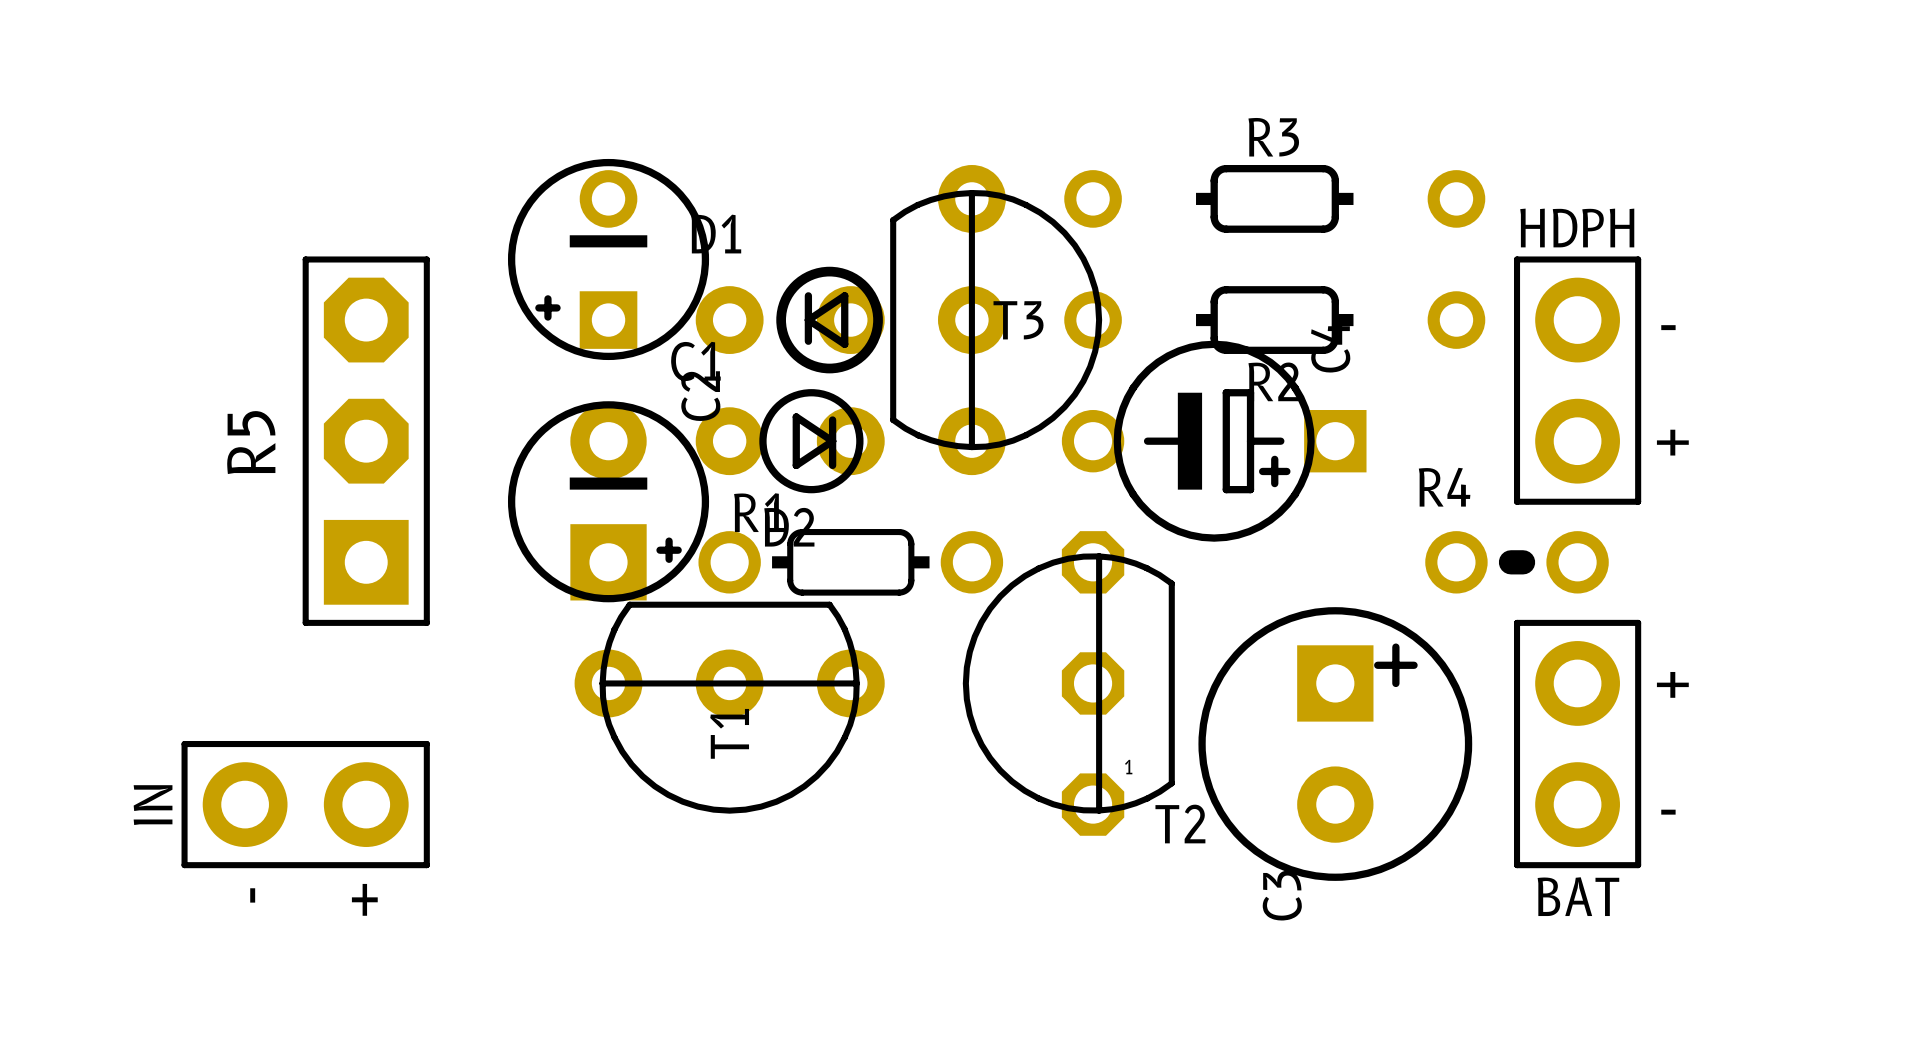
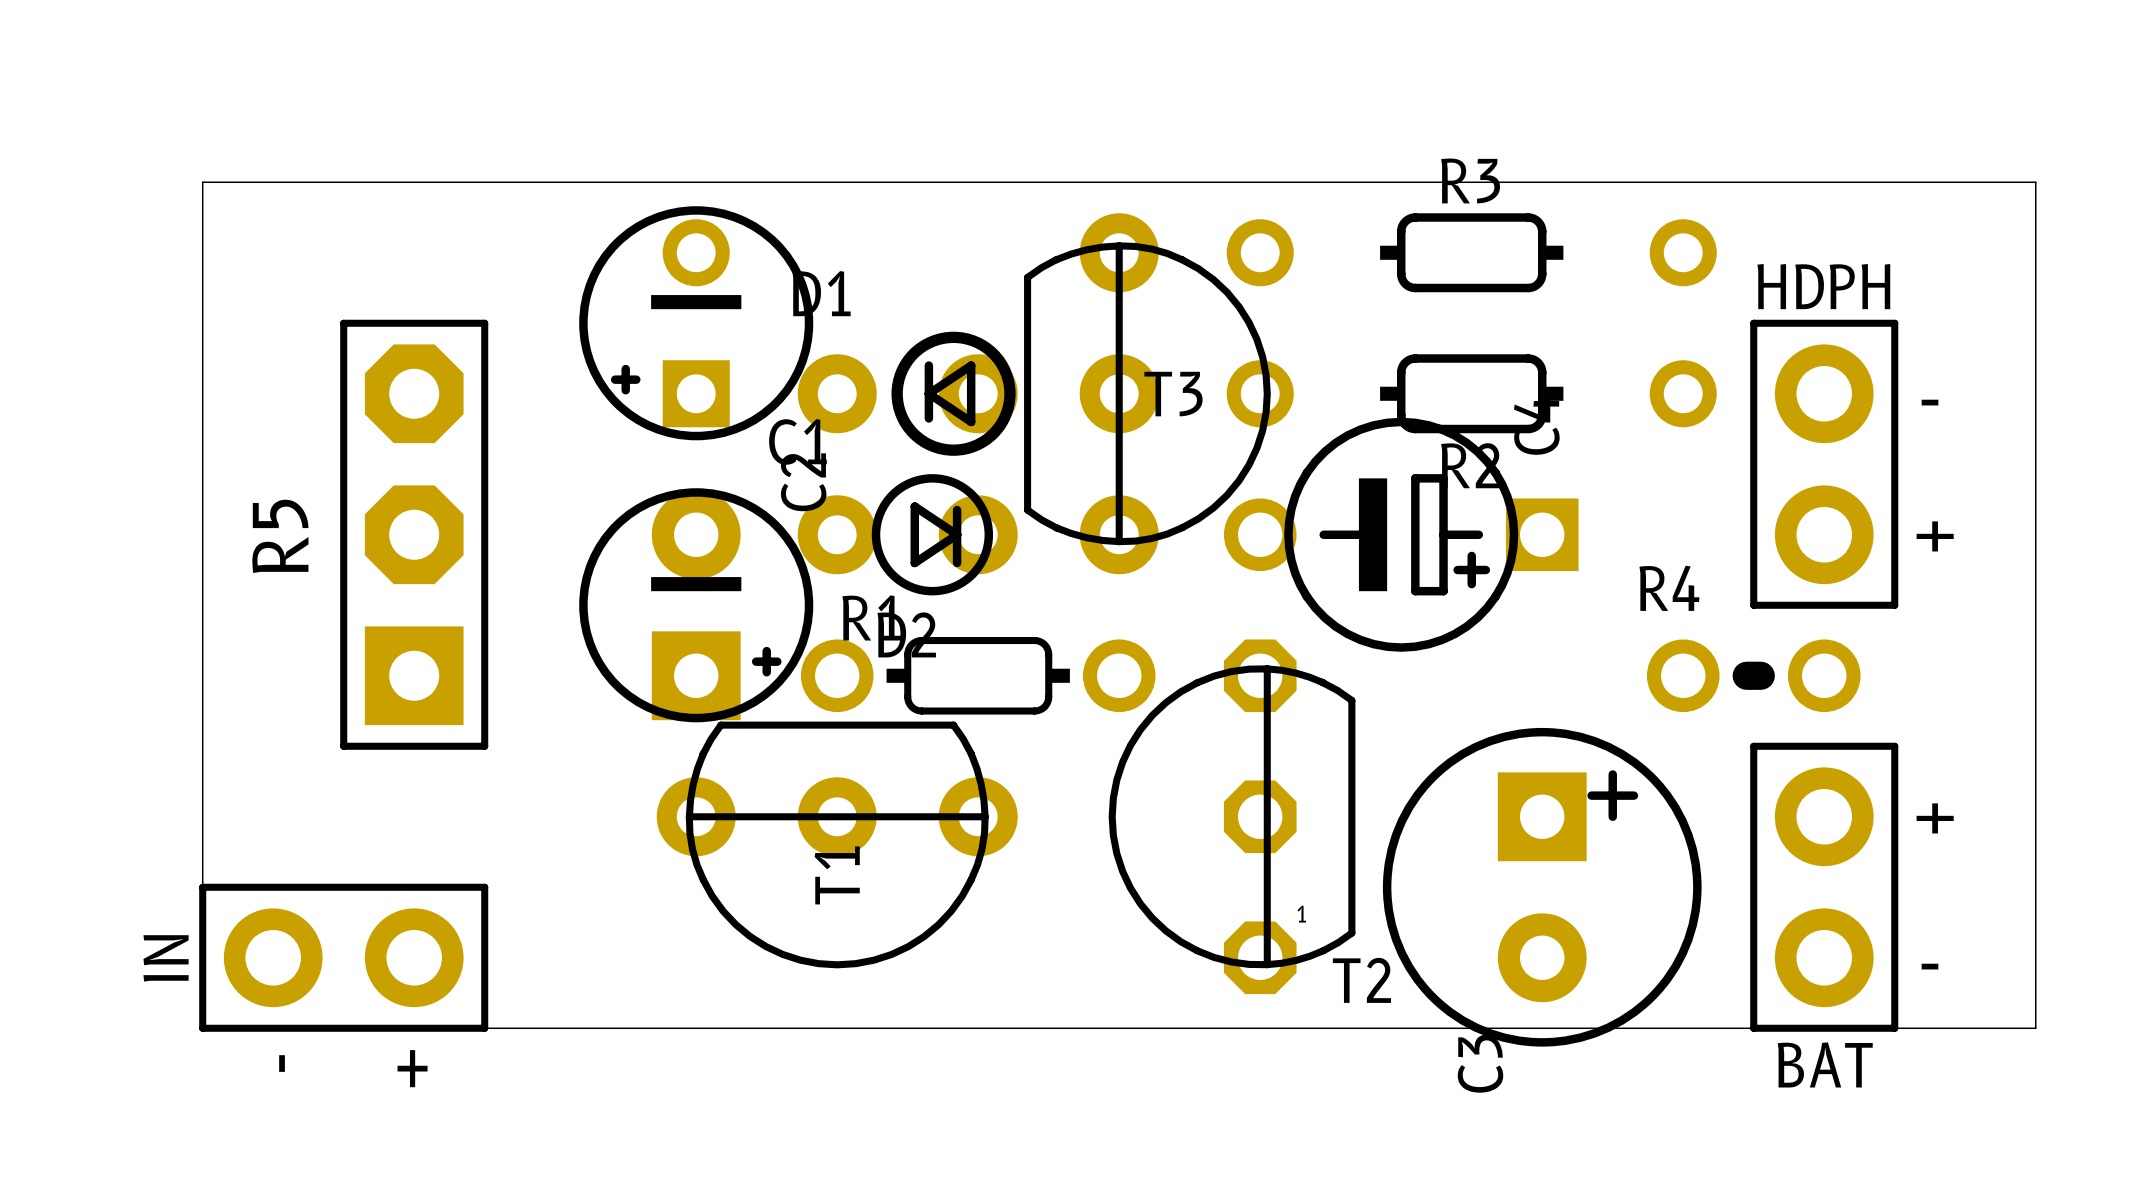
board edge: none -> (202, 182) (2035, 182) (2035, 1028) (202, 1028) (202, 182)

